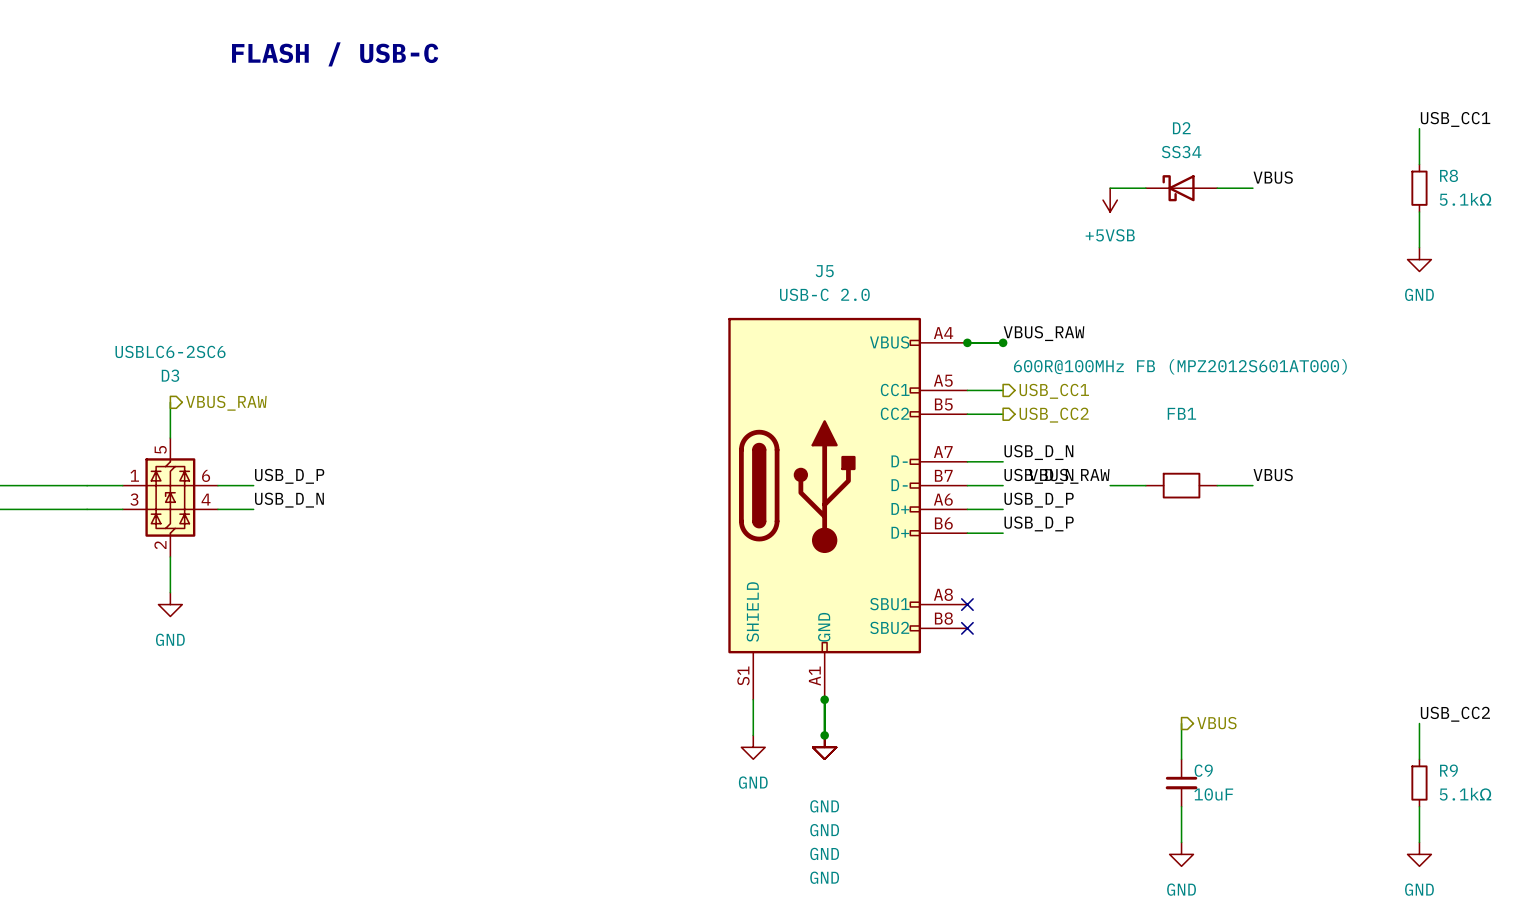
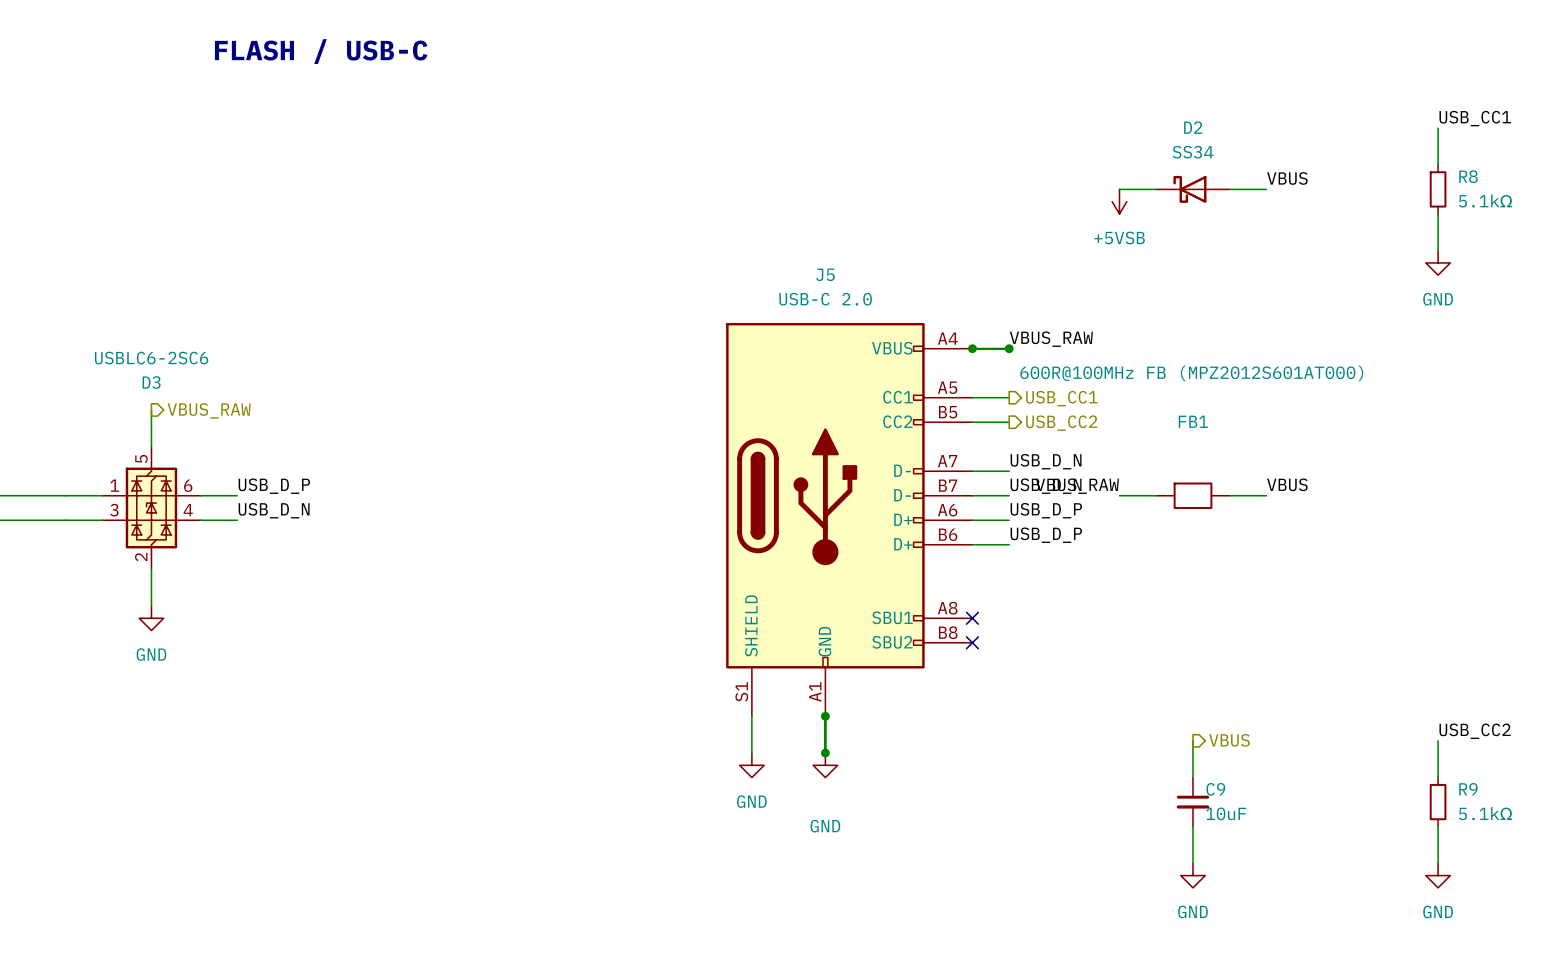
power symbol: GND (824, 747) -> none
power symbol: GND (824, 747) -> none
power symbol: GND (824, 747) -> none

